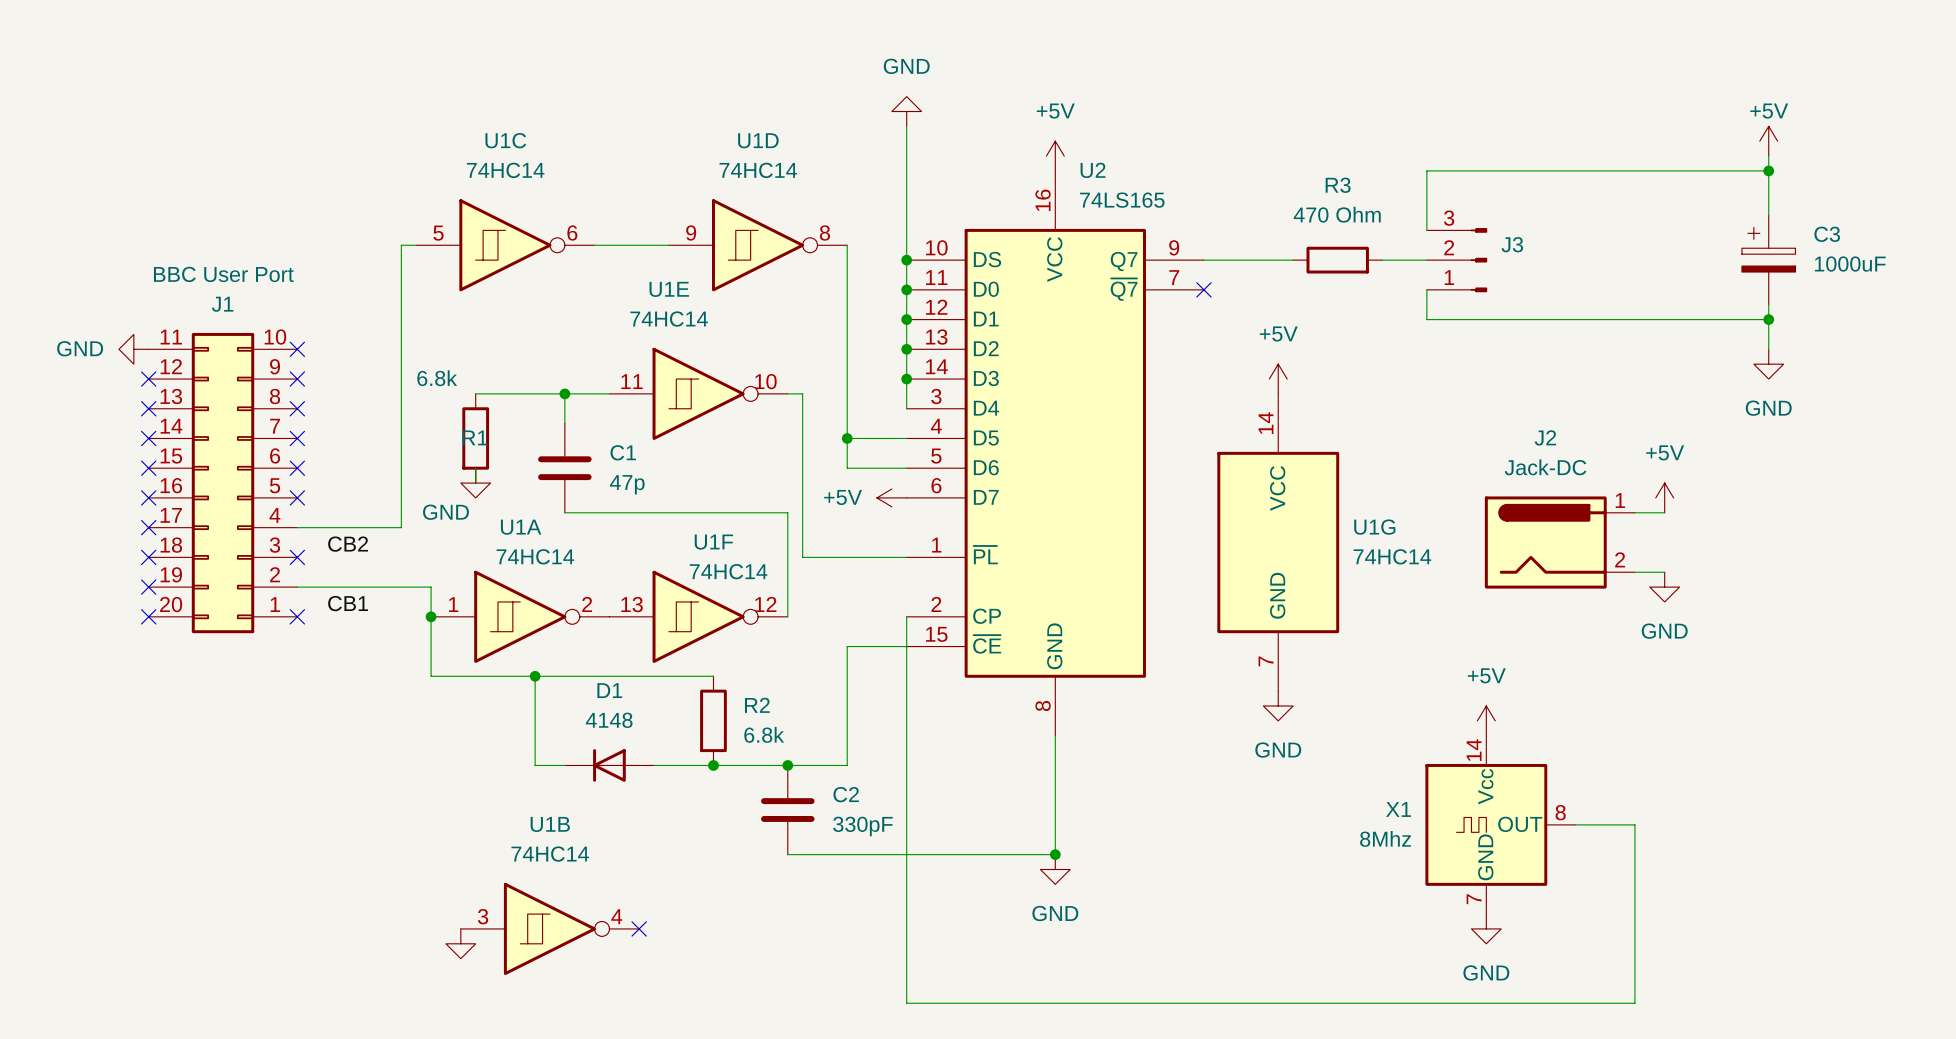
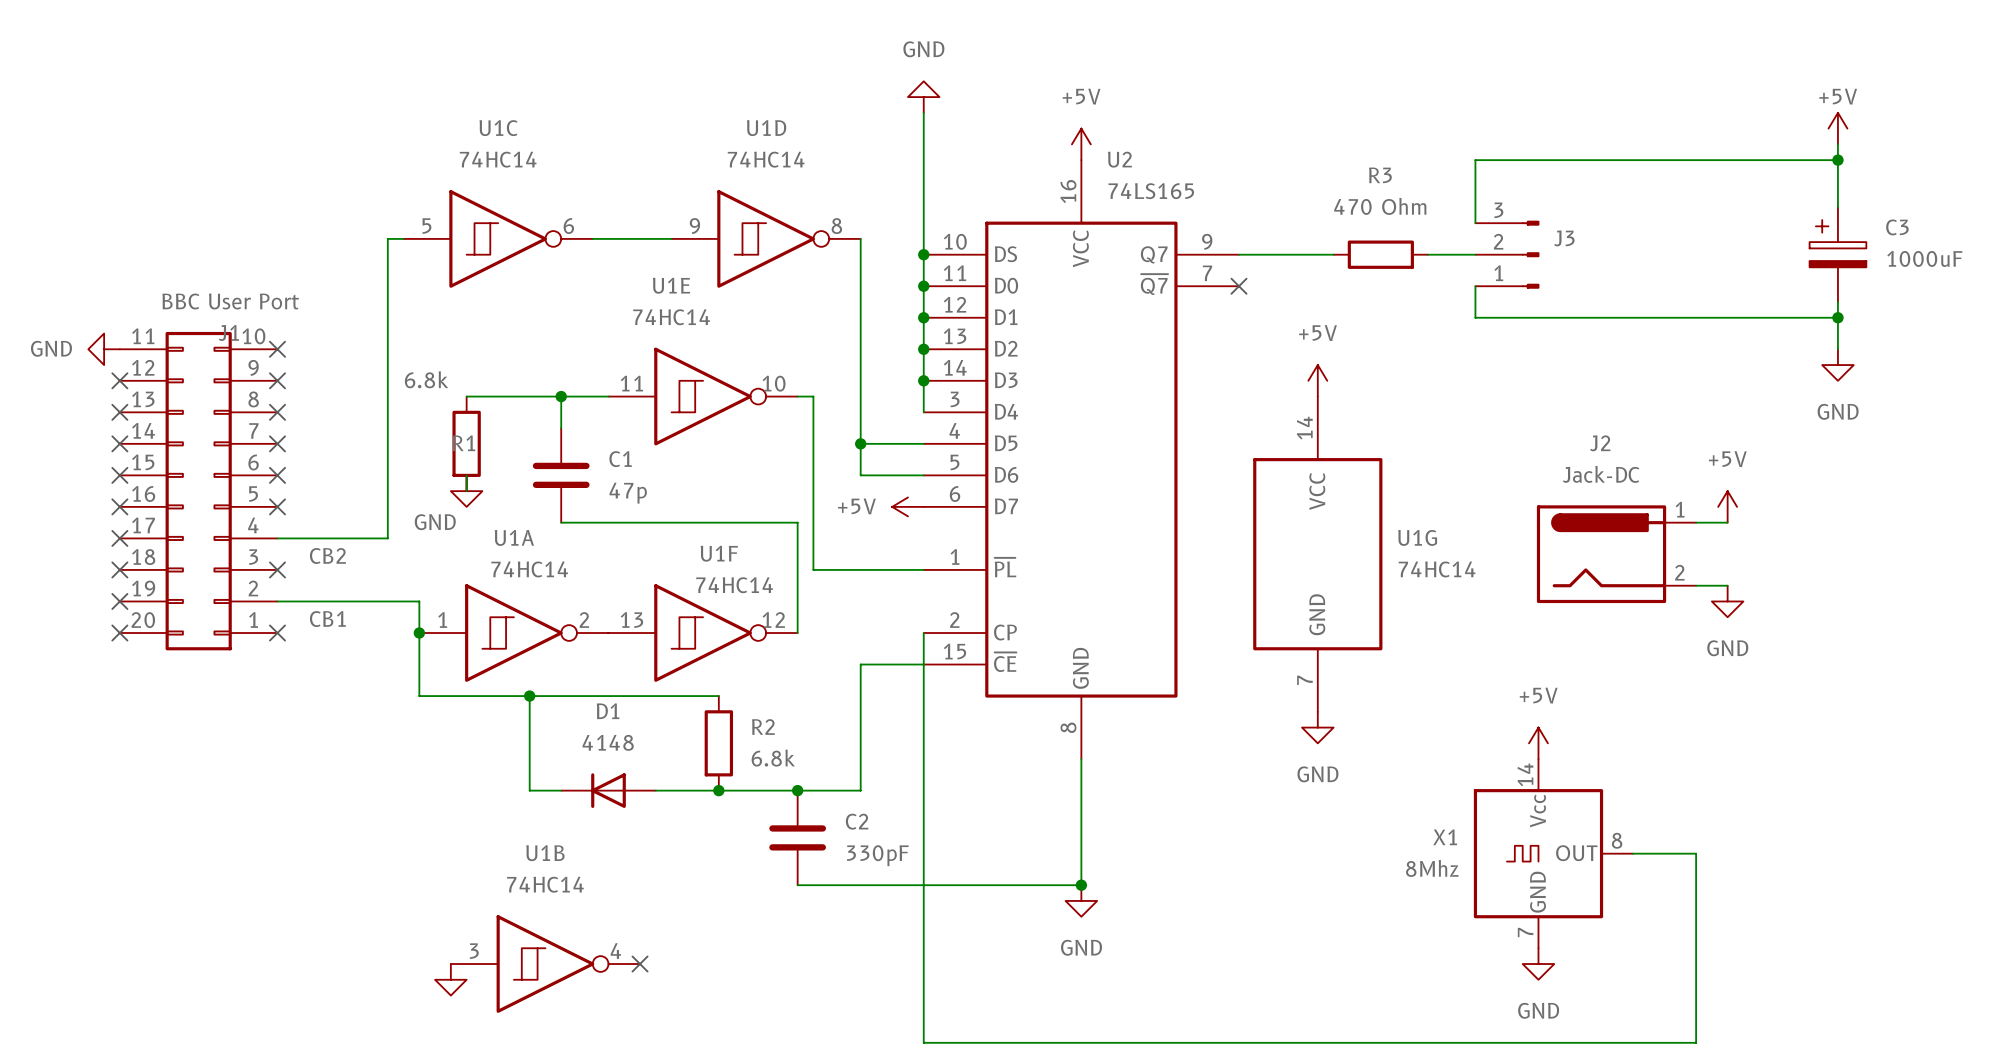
J1 value position: BBC User Port (223, 274) -> BBC User Port (230, 301)
J1 name position: J1 (222, 304) -> J1 (228, 333)

